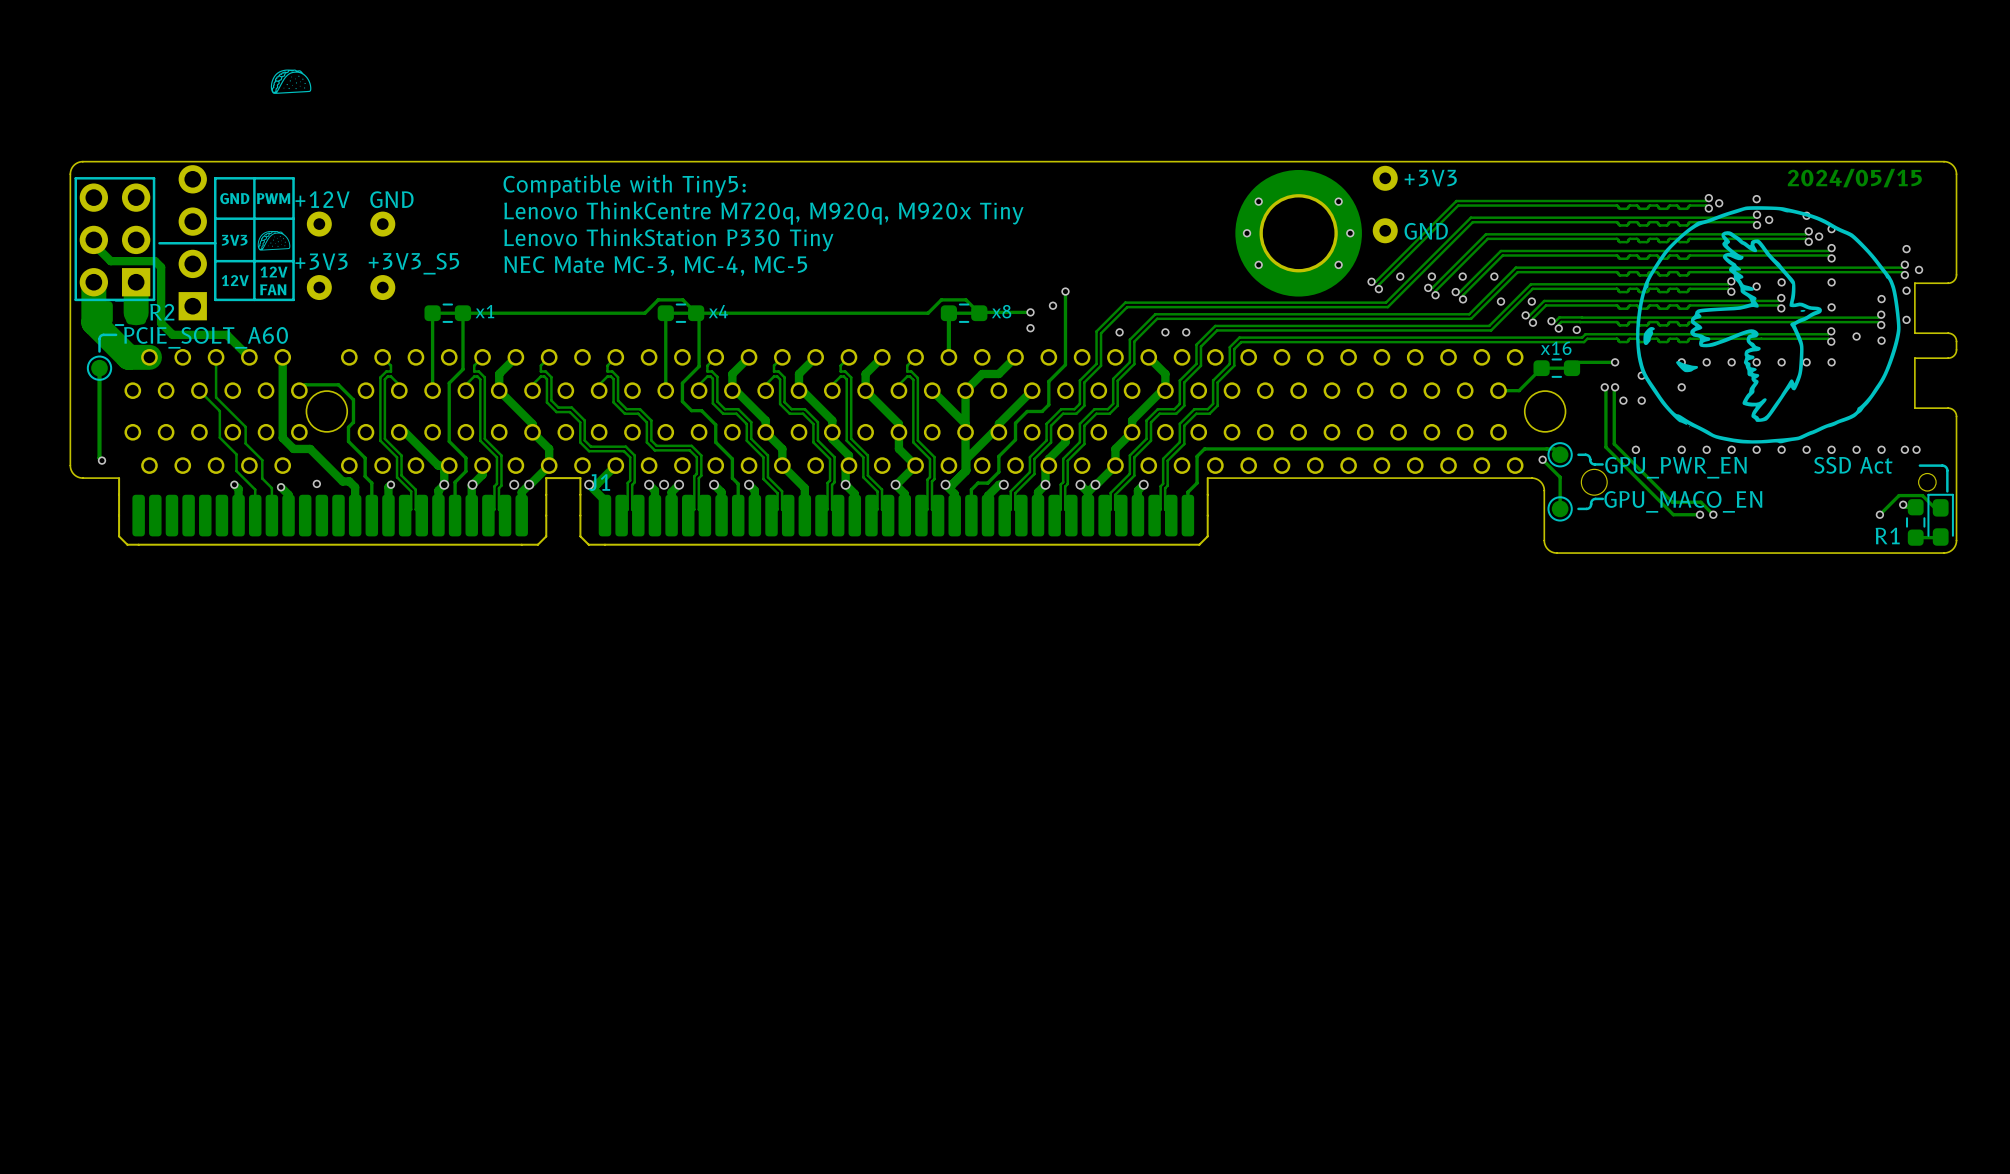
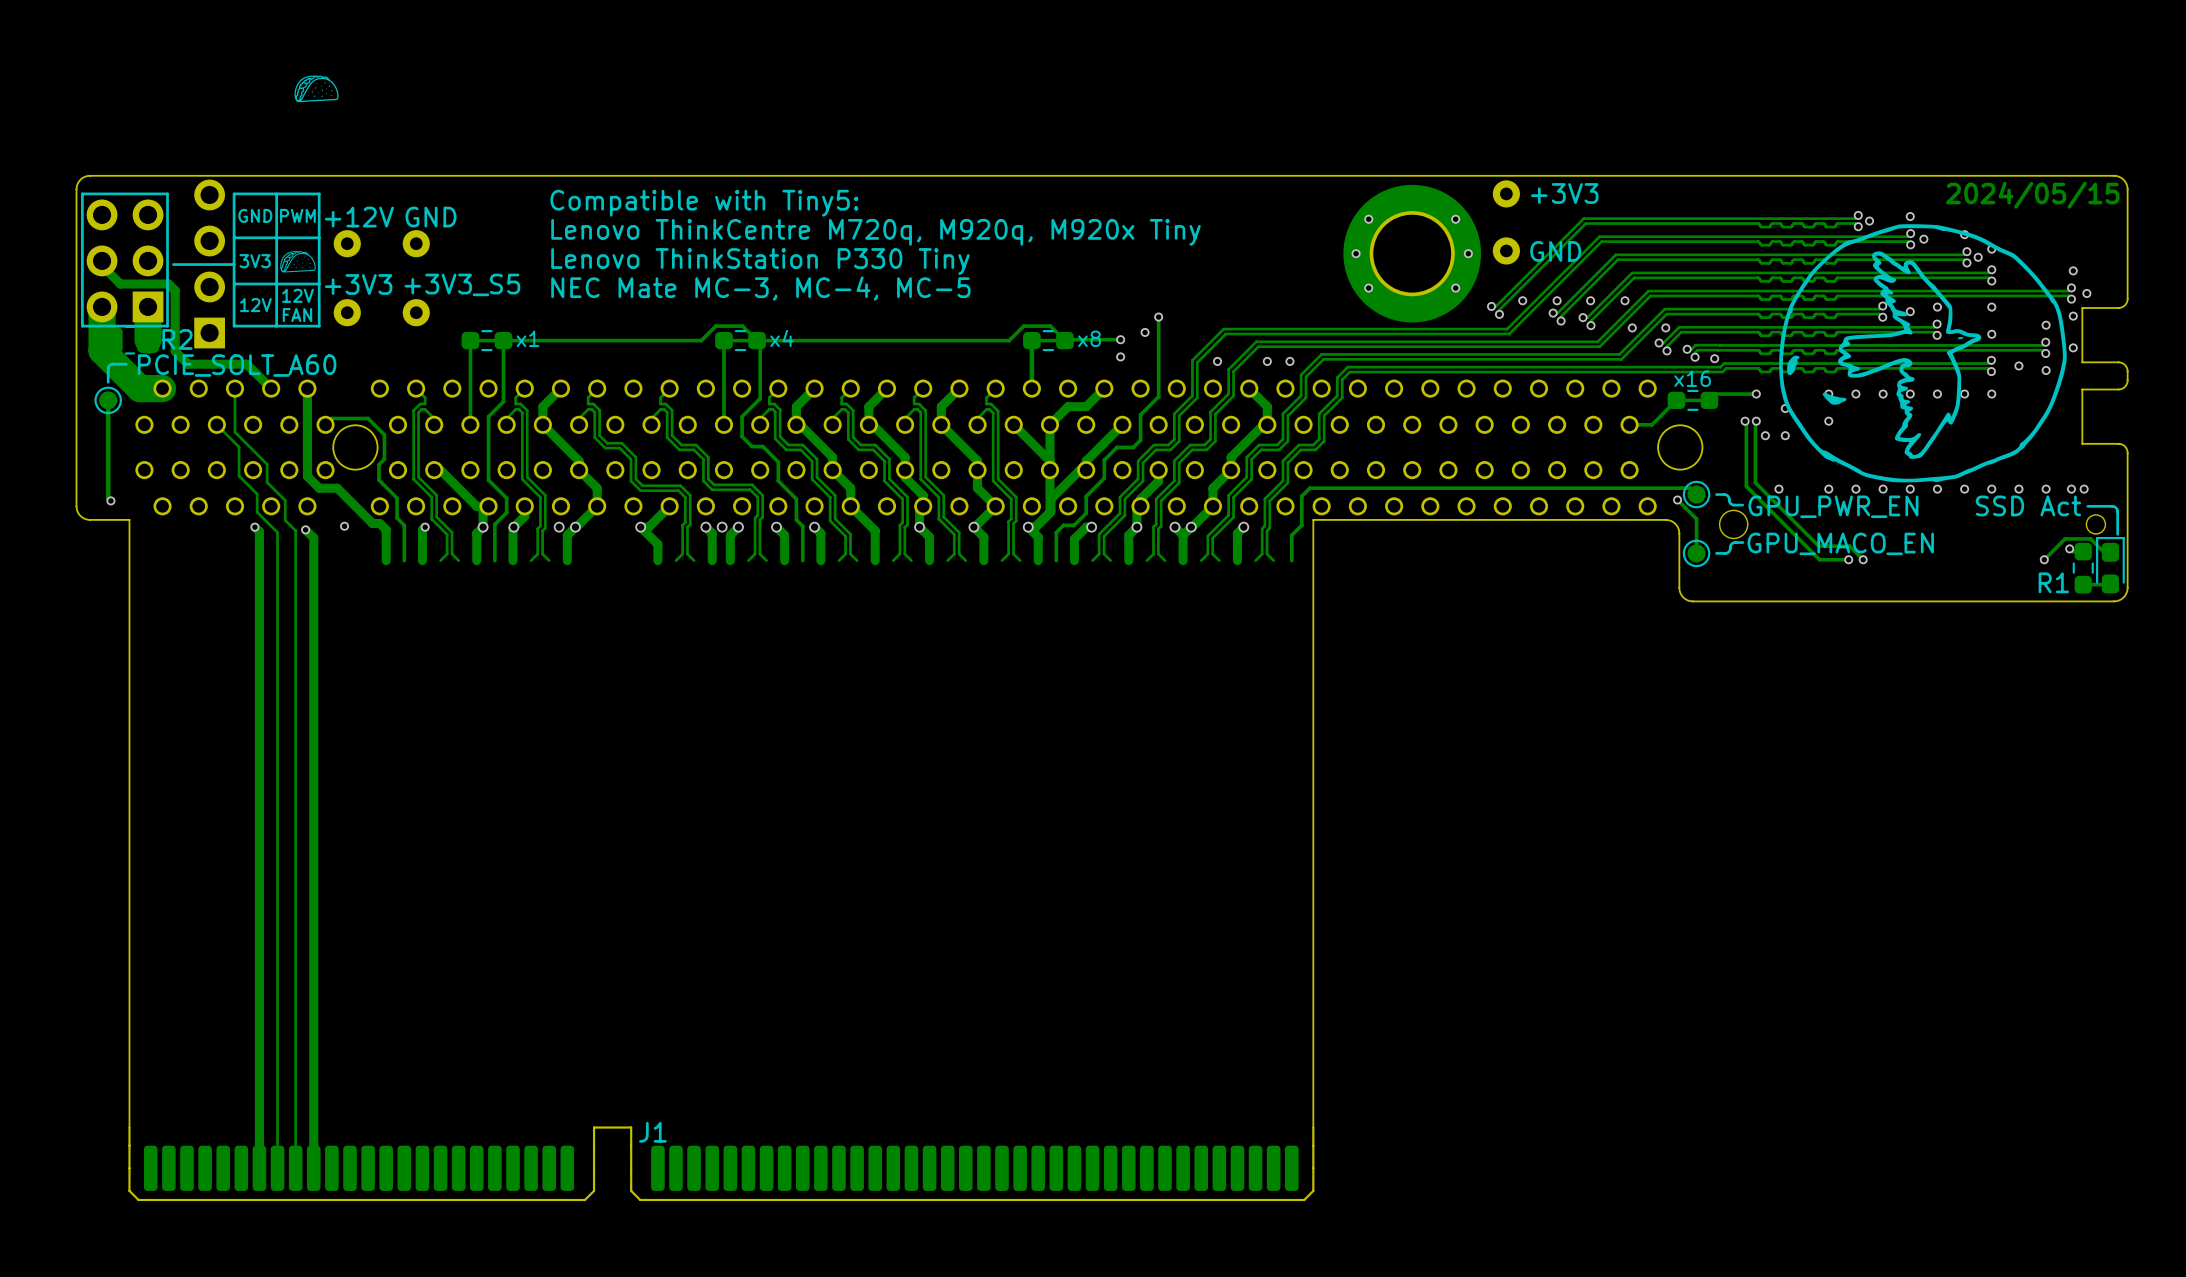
board edge: none -> (129, 519) (129, 1127)
board edge: none -> (1313, 519) (1313, 1127)
J1 position: (663, 511) -> (721, 1163)
track: none -> (259, 560) (259, 1168)
track: none -> (277, 560) (277, 1168)
track: none -> (295, 560) (295, 1168)
track: none -> (313, 560) (313, 1168)

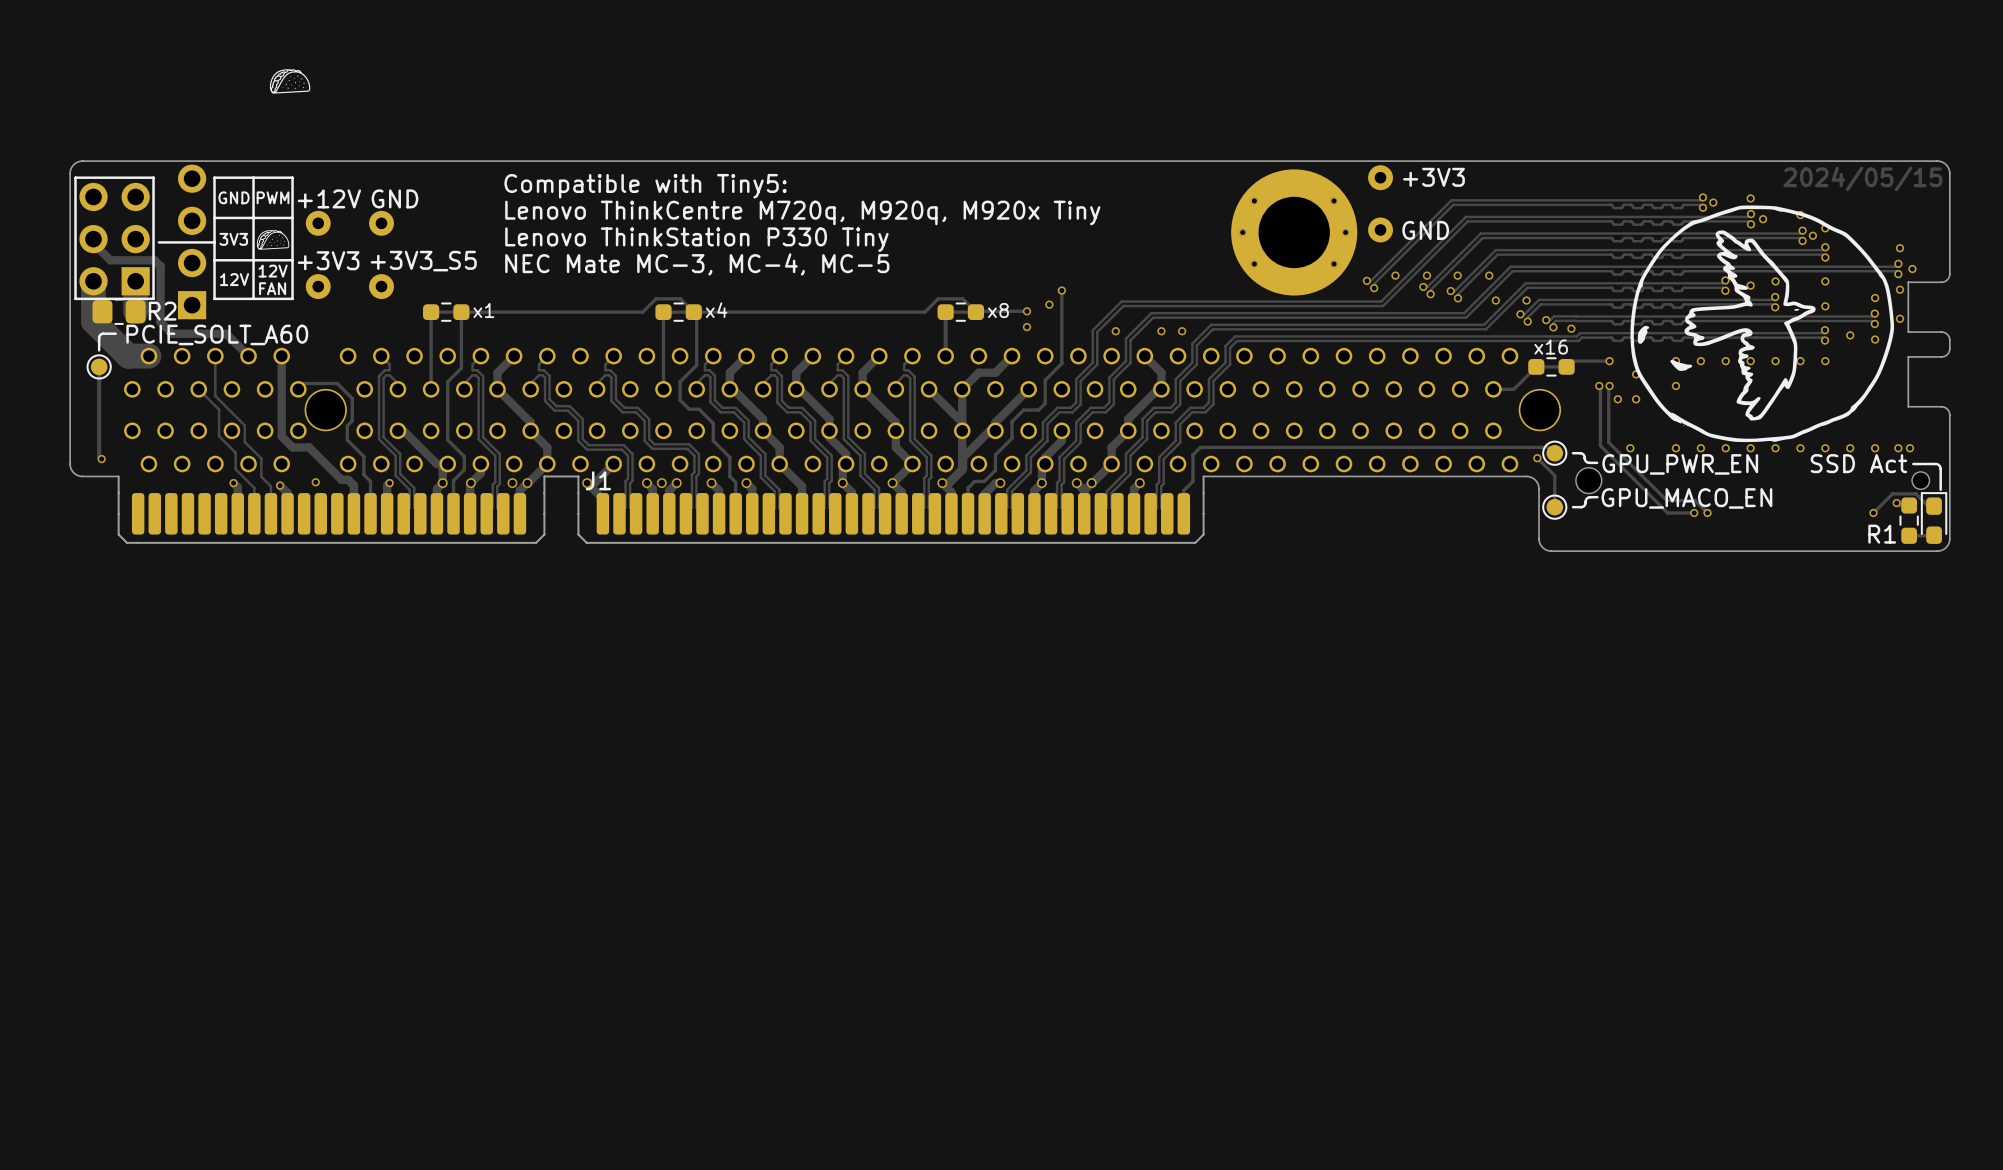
board edge: (129, 519) (129, 1127) -> none
board edge: (1313, 519) (1313, 1127) -> none
track: (259, 560) (259, 1168) -> none
track: (277, 560) (277, 1168) -> none
track: (295, 560) (295, 1168) -> none
track: (313, 560) (313, 1168) -> none
J1 position: (721, 1163) -> (661, 509)

